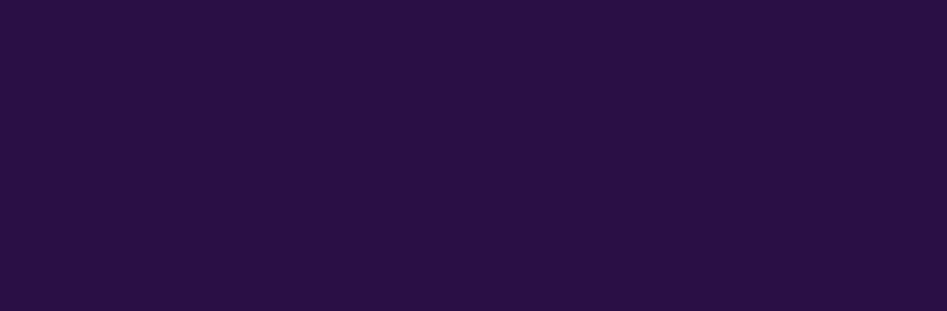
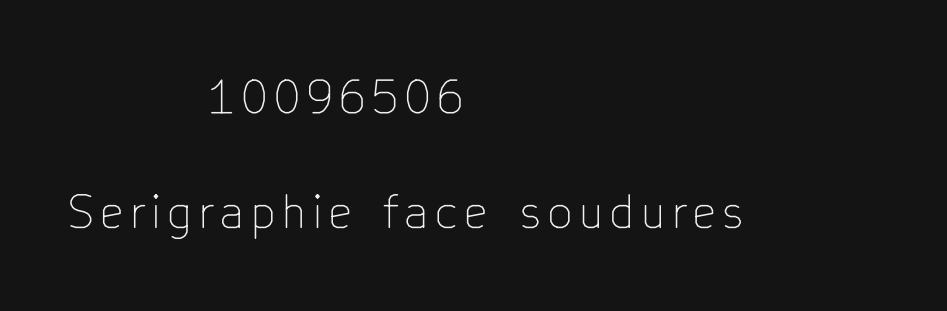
text: none -> 10096506 (335, 96)
text: none -> Serigraphie face soudures (405, 216)

